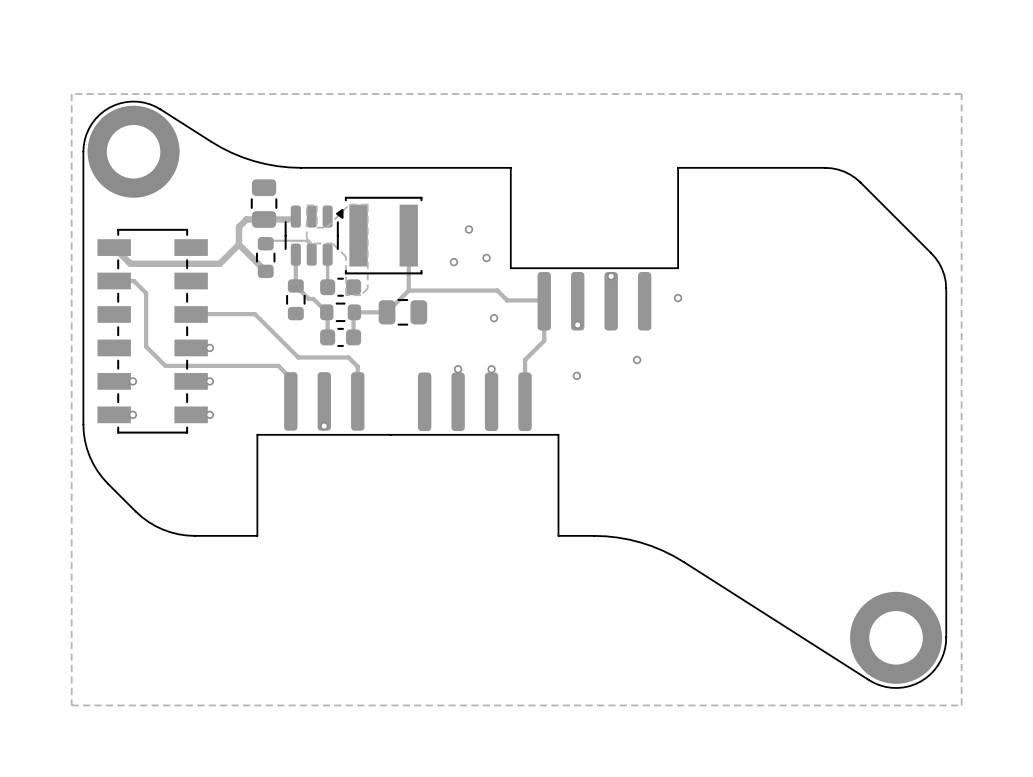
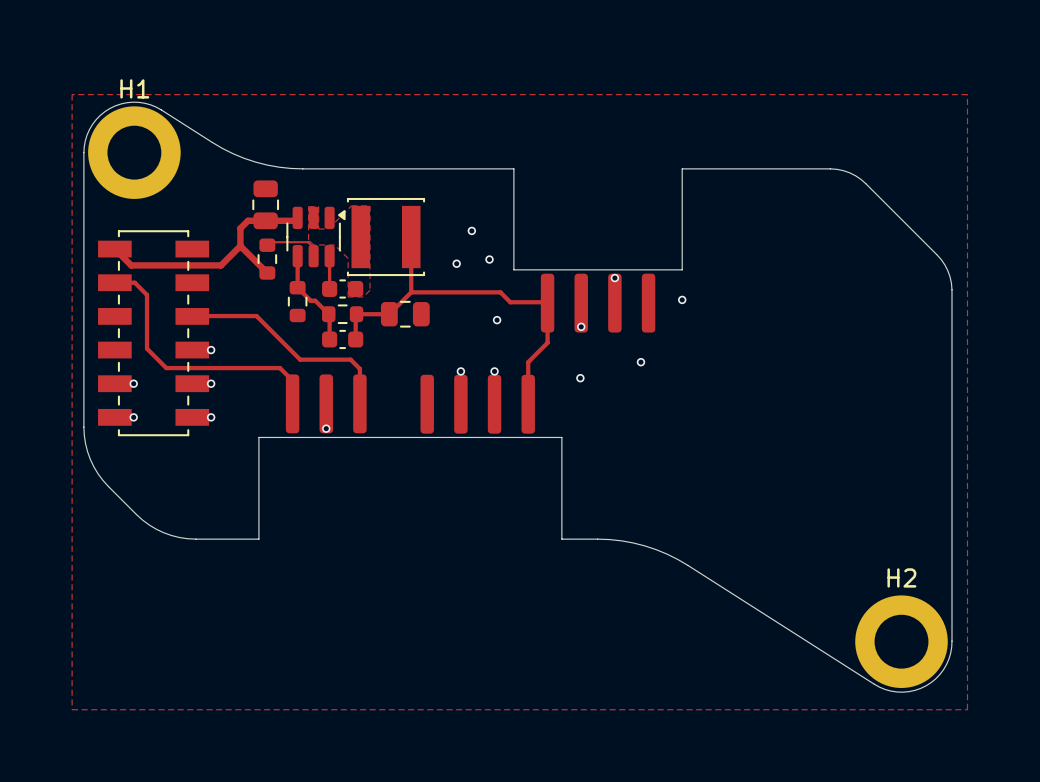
H1 name: none -> H1 (134, 88)
H2 name: none -> H2 (901, 577)

